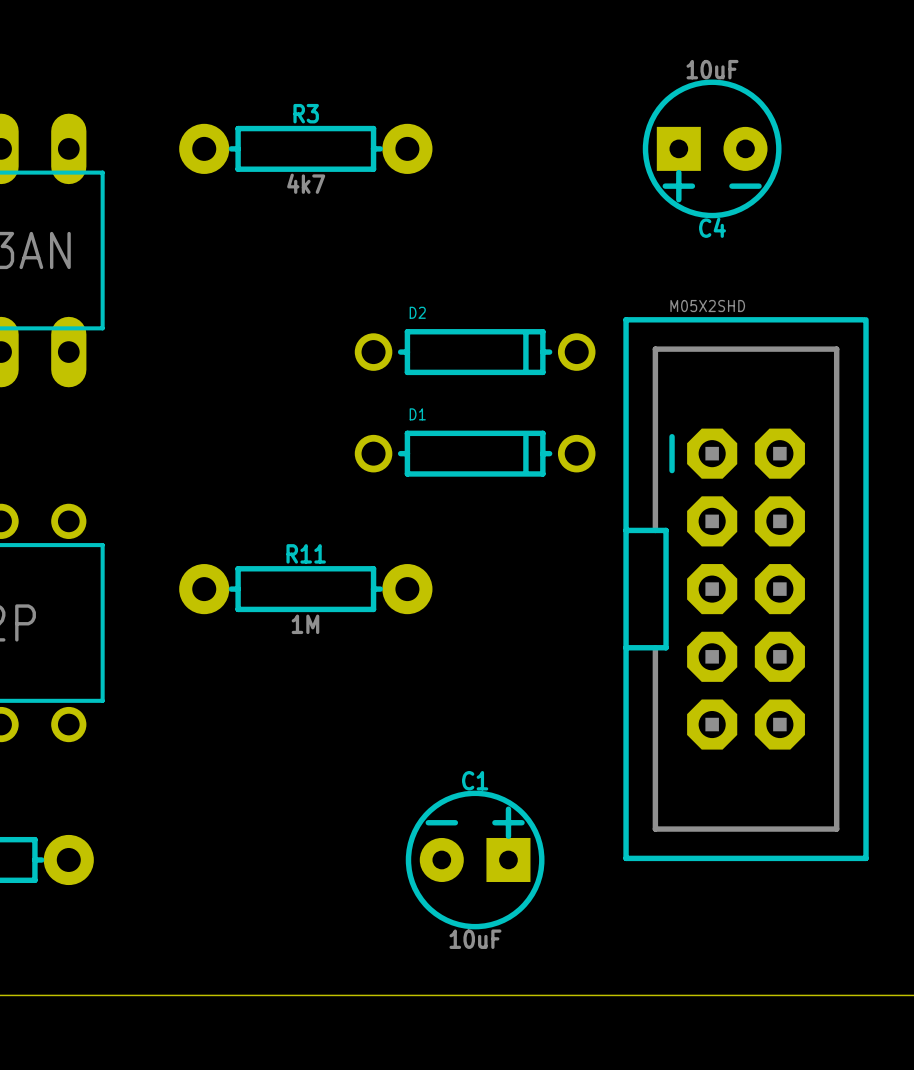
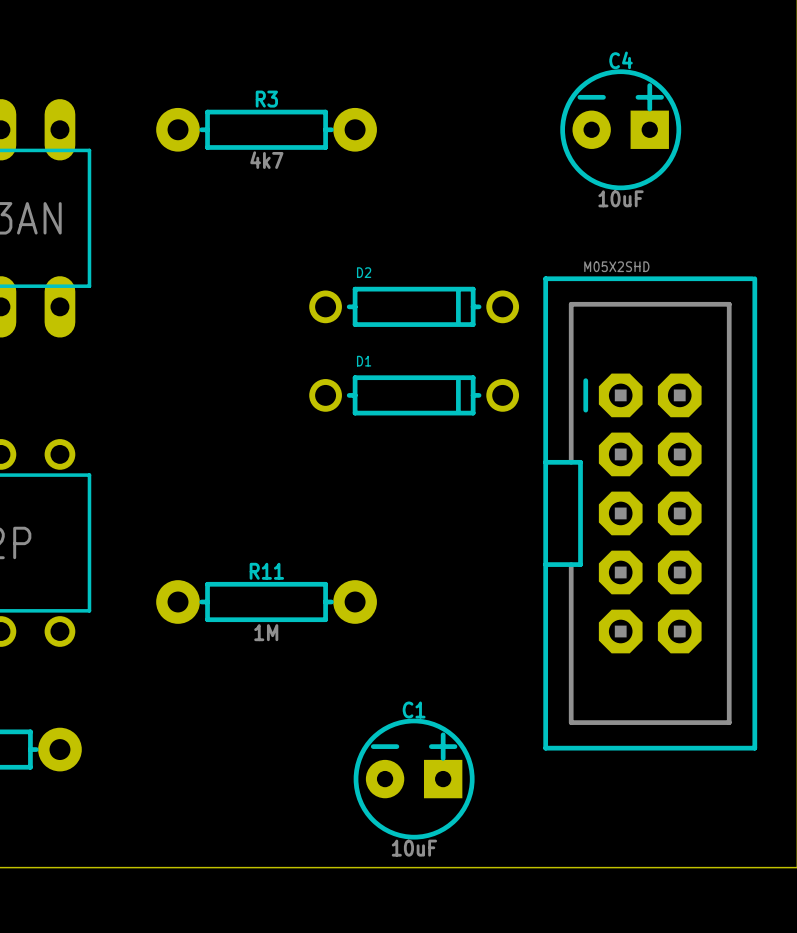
C4 rotation: 0° (712, 148) -> 180° (620, 129)
R11 position: (305, 589) -> (266, 601)
C1 position: (475, 859) -> (414, 779)

